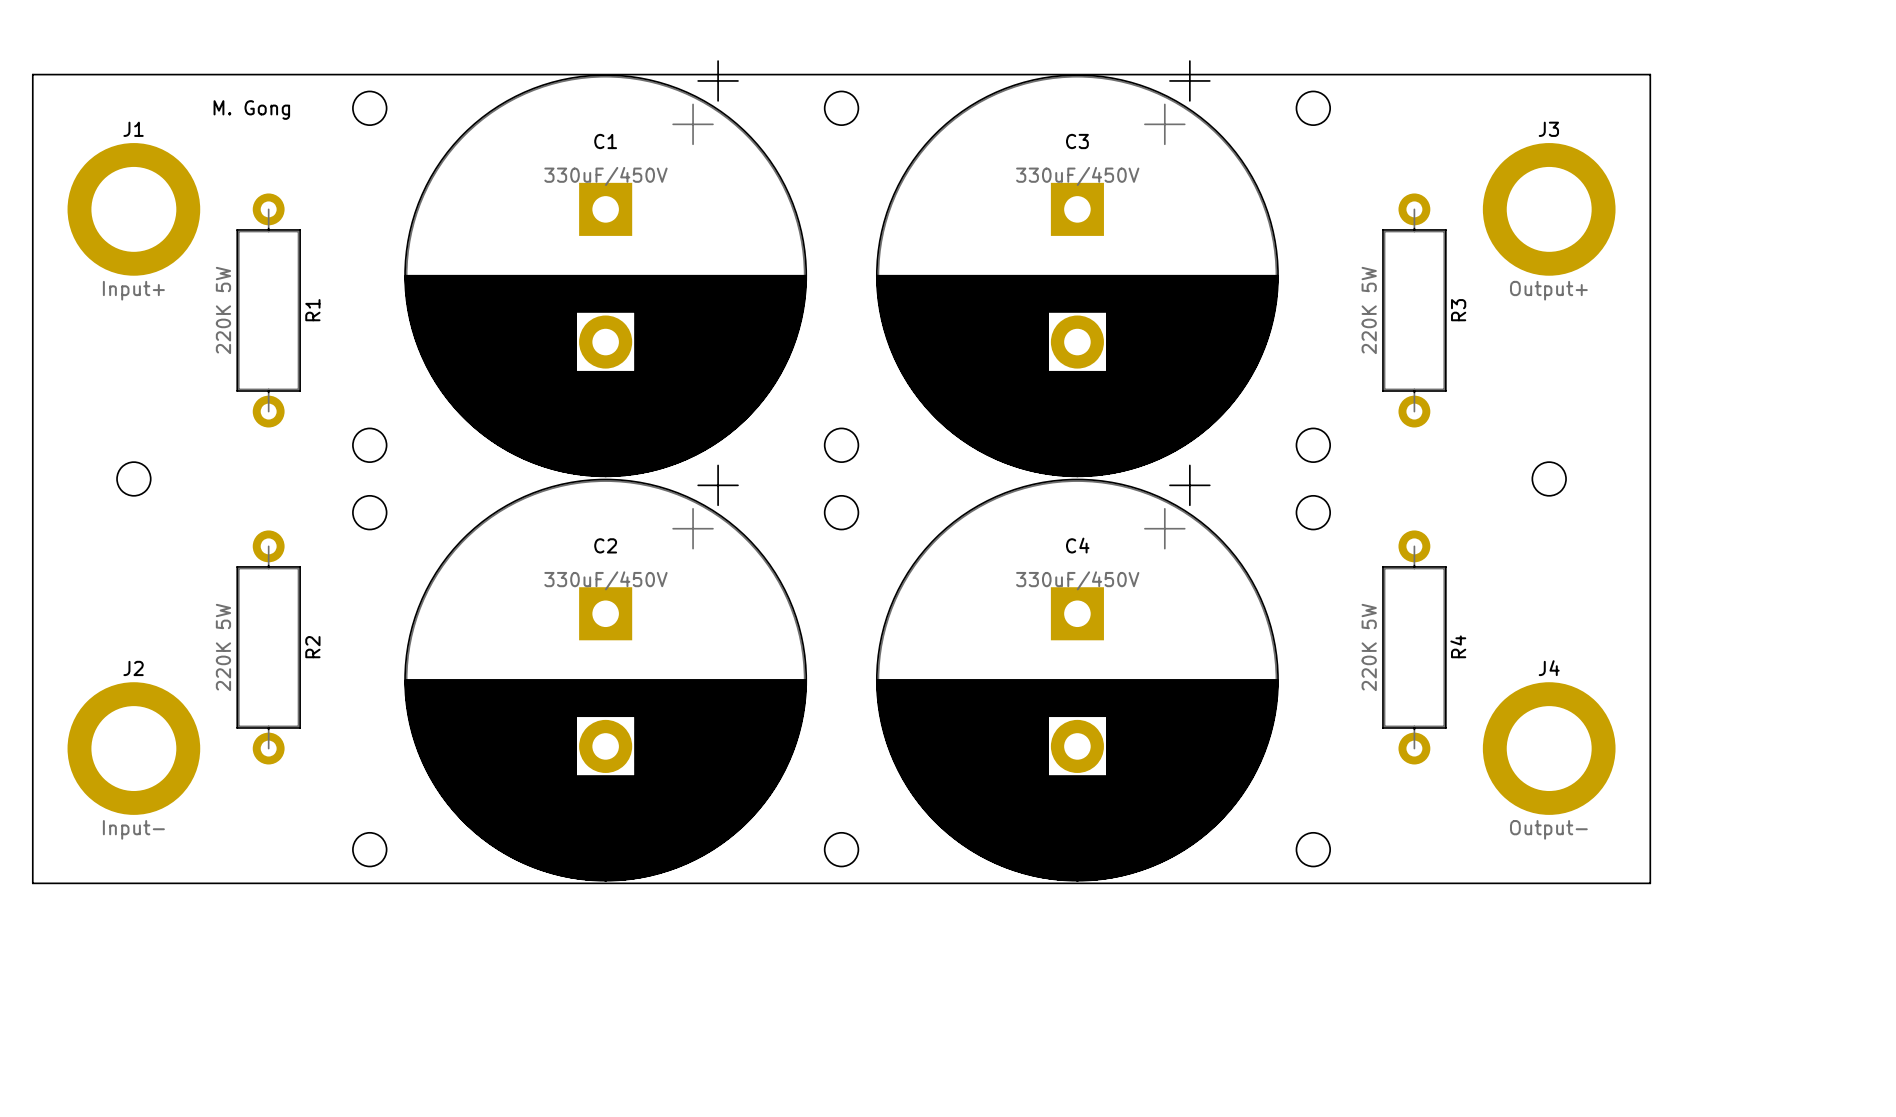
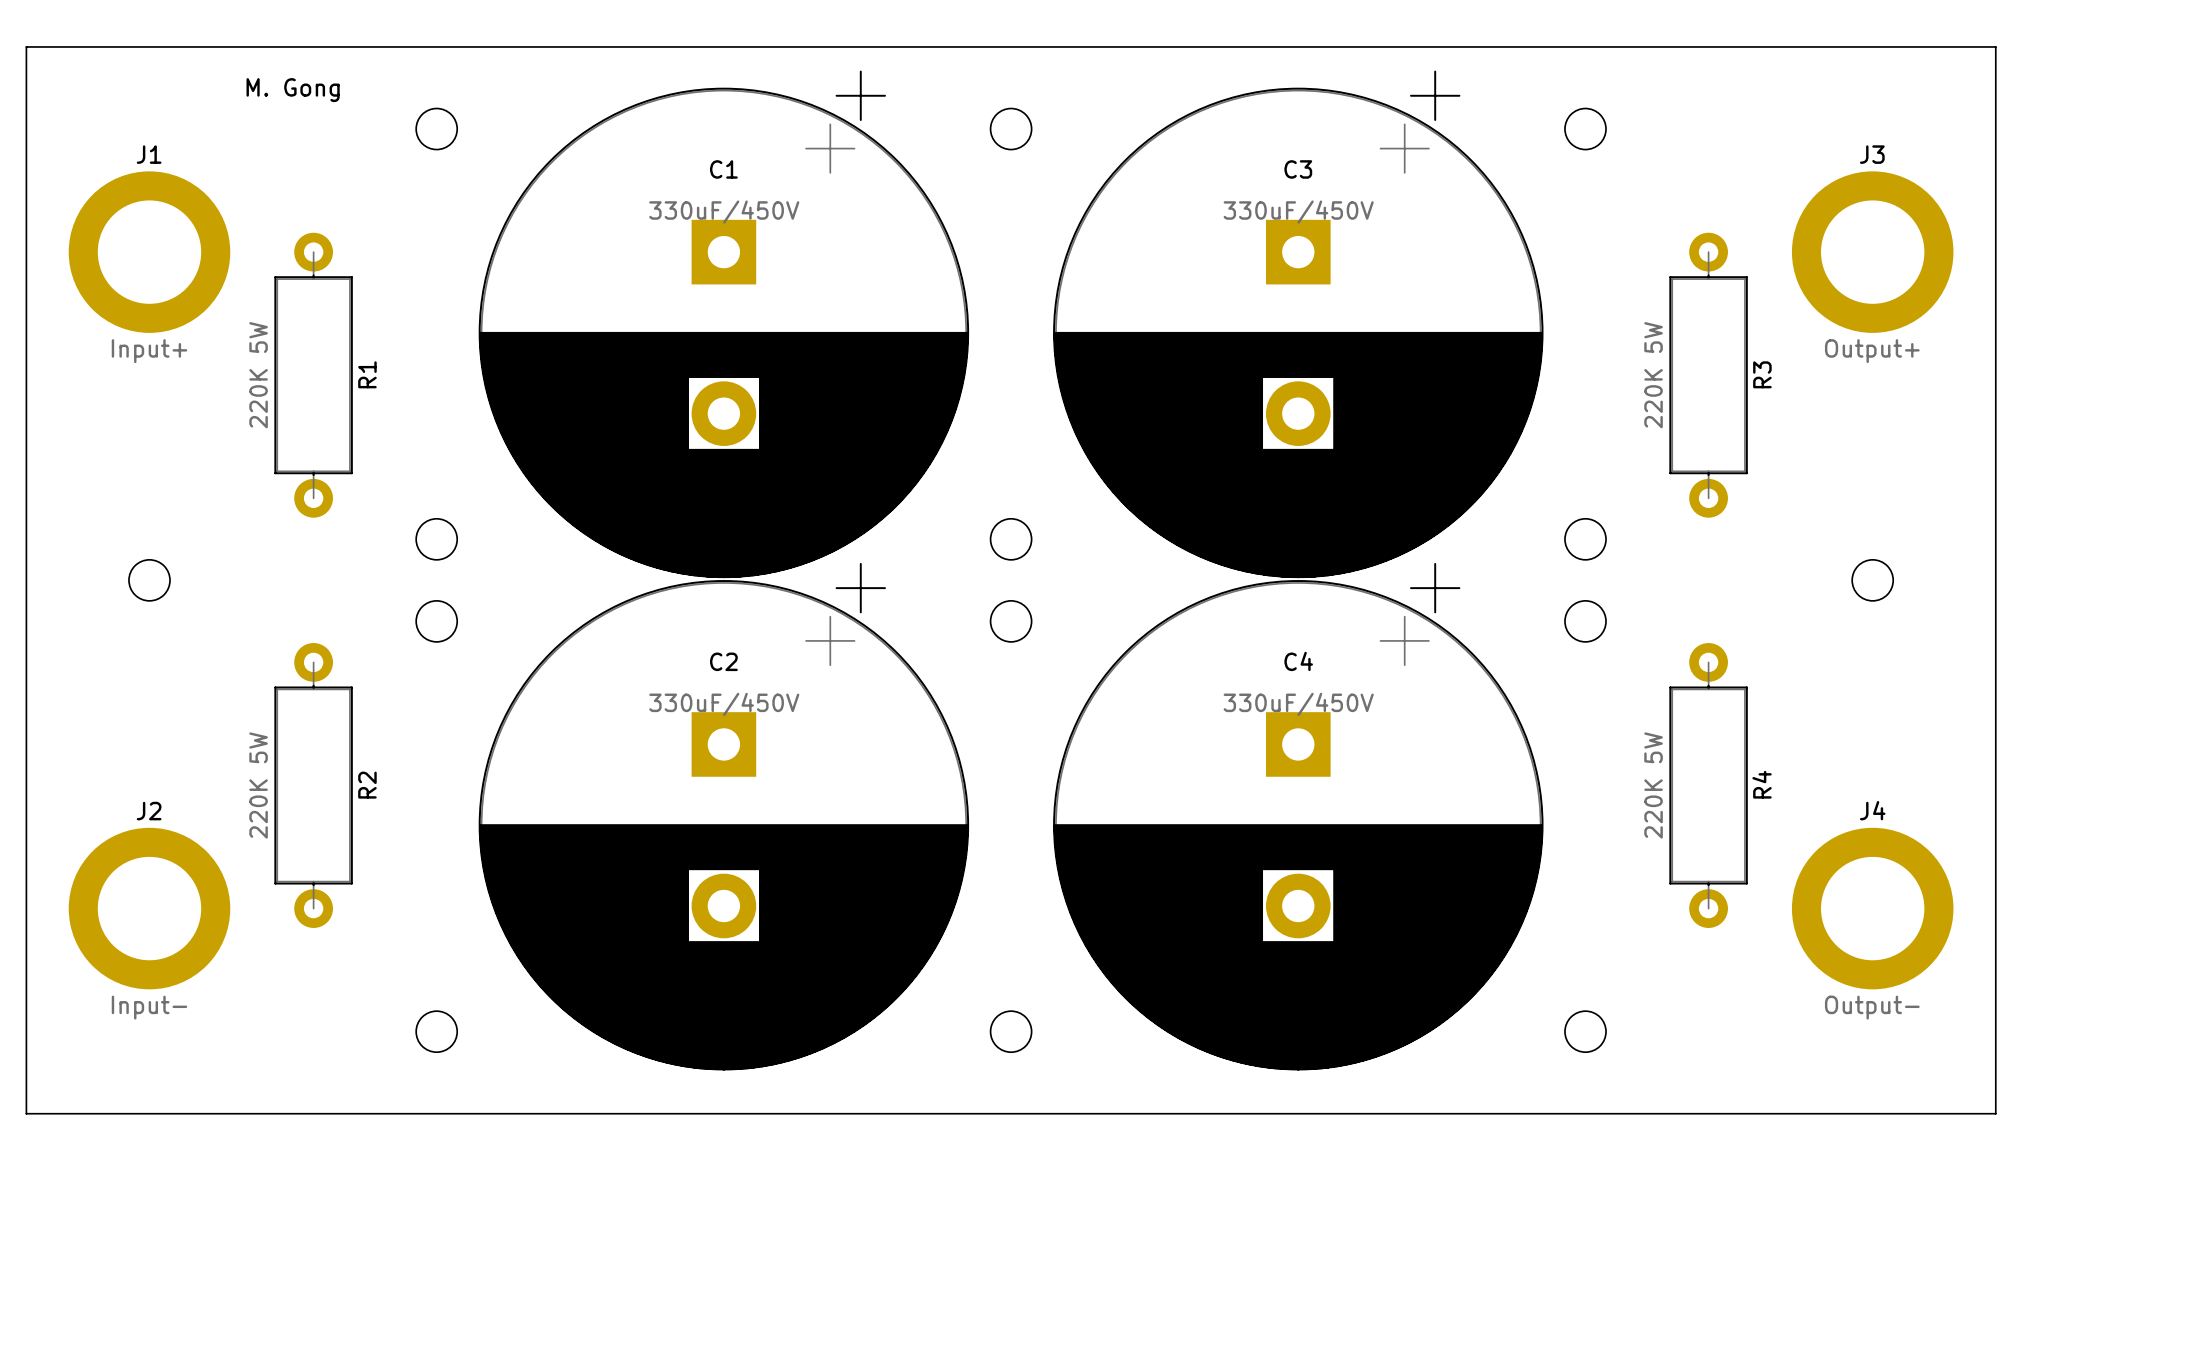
board edge: (32, 74) (1650, 74) -> (26, 88) (26, 46) (1995, 46) (1995, 88)
text position: M. Gong (251, 110) -> M. Gong (293, 90)
board edge: (32, 883) (1650, 883) -> (26, 1072) (26, 1113) (1995, 1113) (1995, 1072)

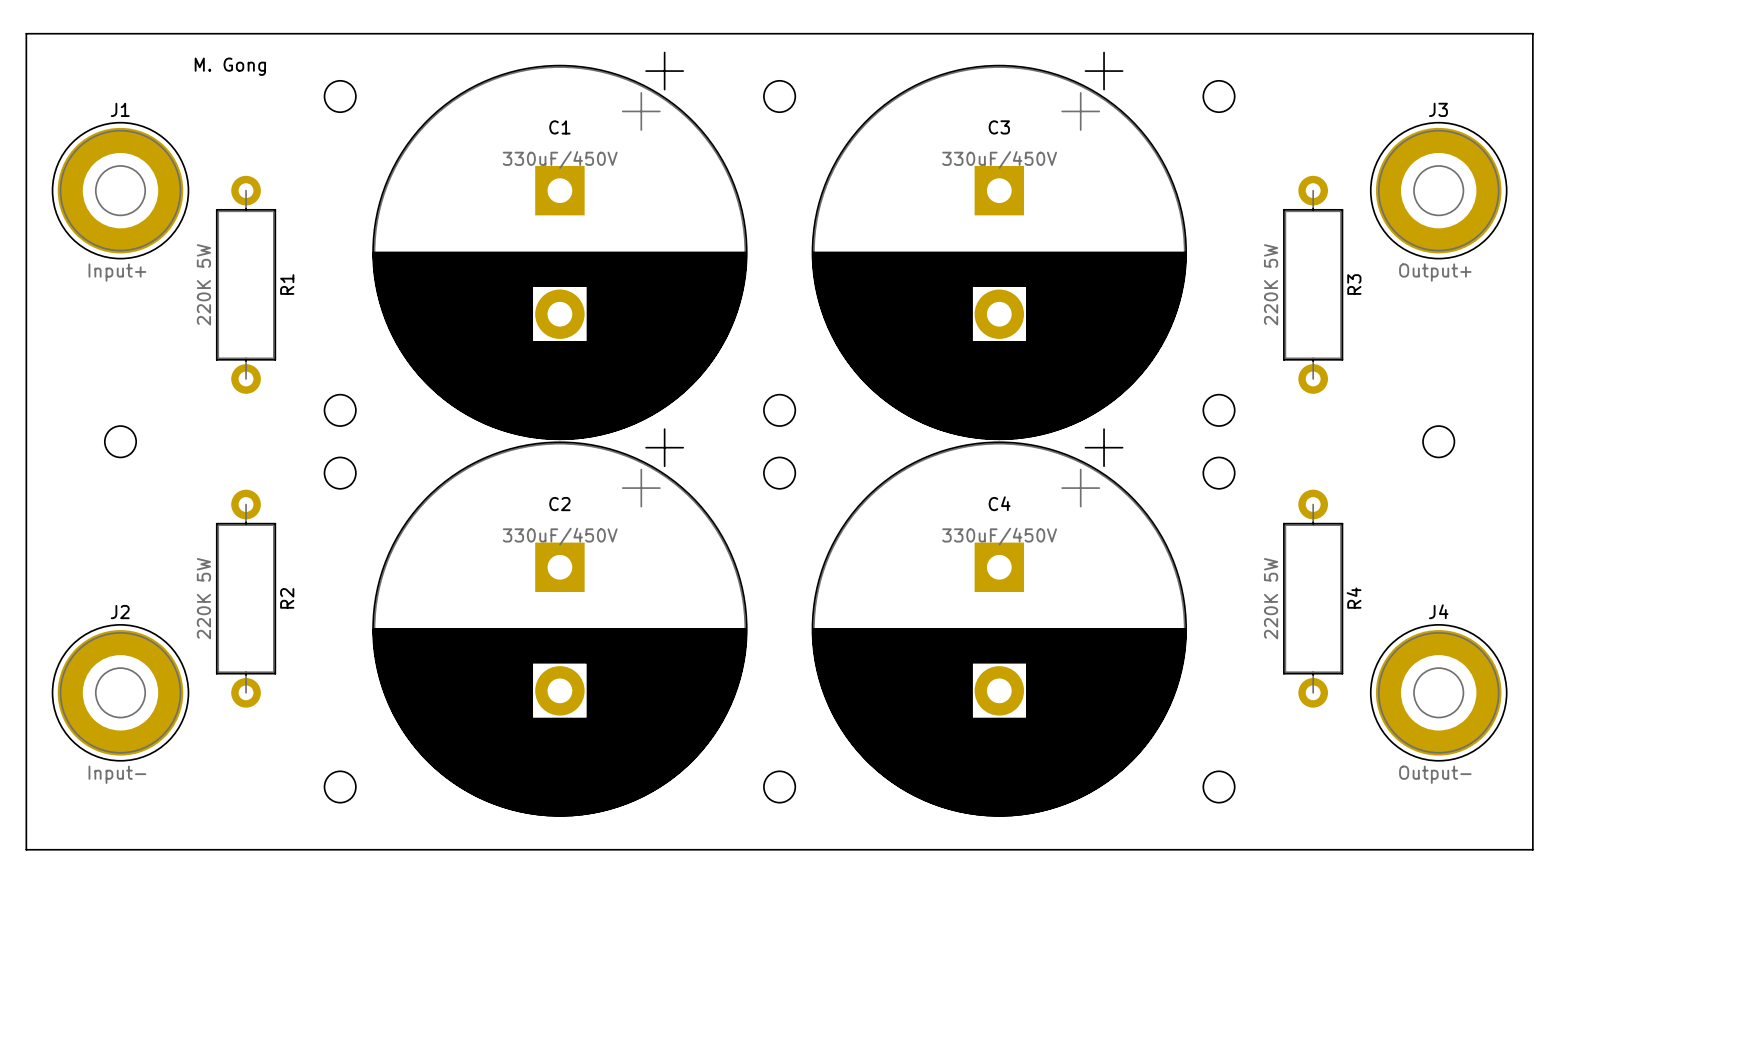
J1 footprint: [68, 171, 231, 333] -> [51, 121, 190, 260]
J3 footprint: [1791, 171, 1954, 333] -> [1370, 121, 1508, 260]
J2 footprint: [68, 827, 231, 990] -> [51, 624, 190, 762]
J4 footprint: [1791, 827, 1954, 990] -> [1370, 624, 1508, 762]

